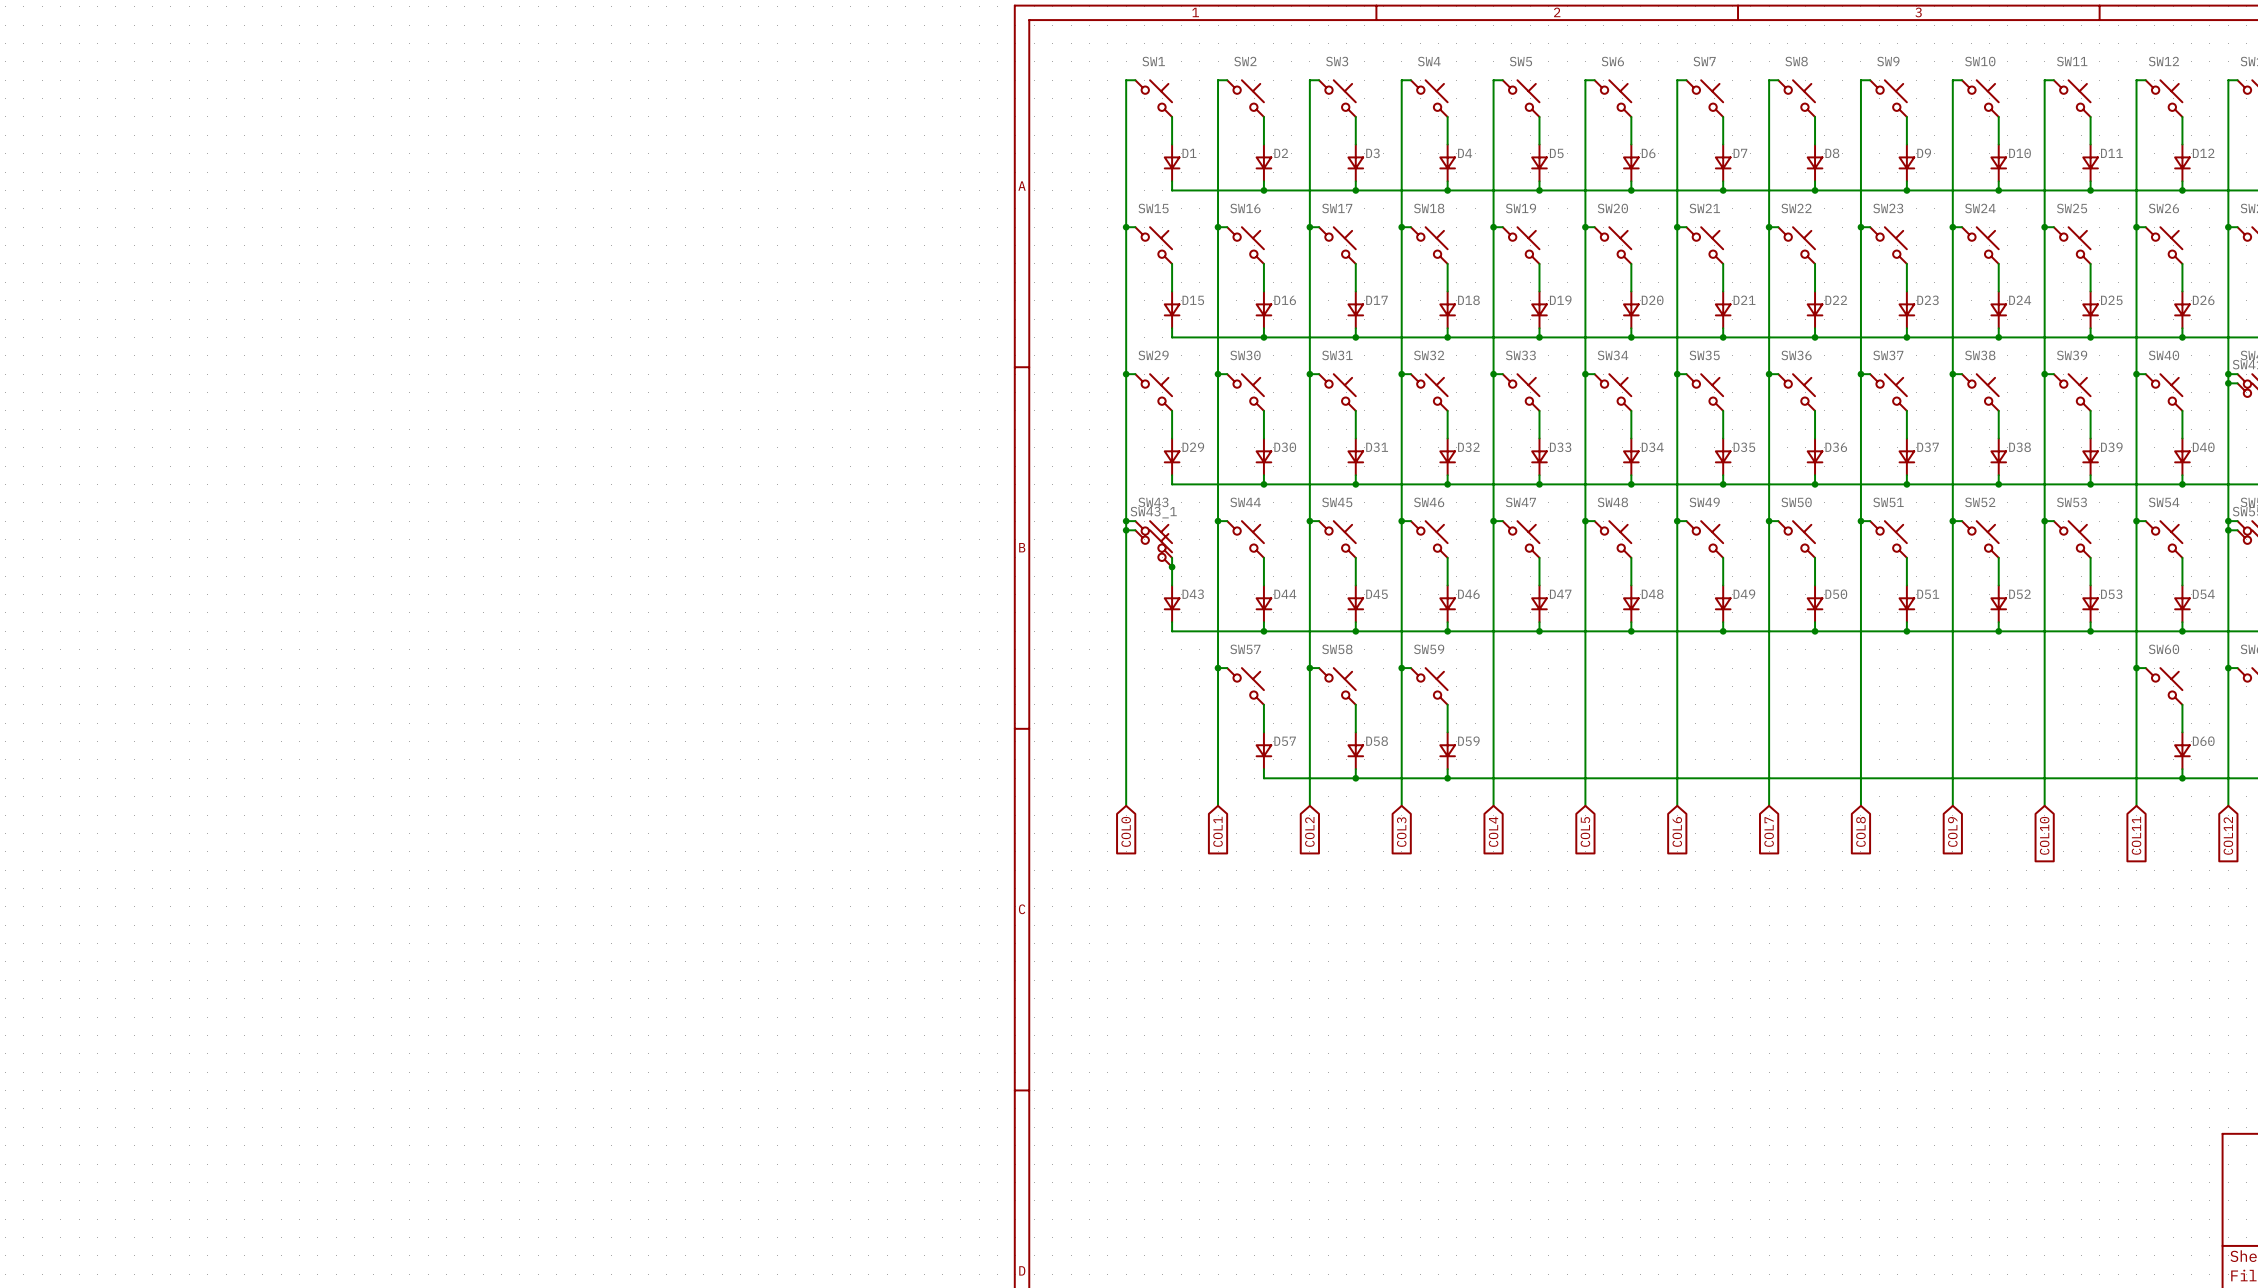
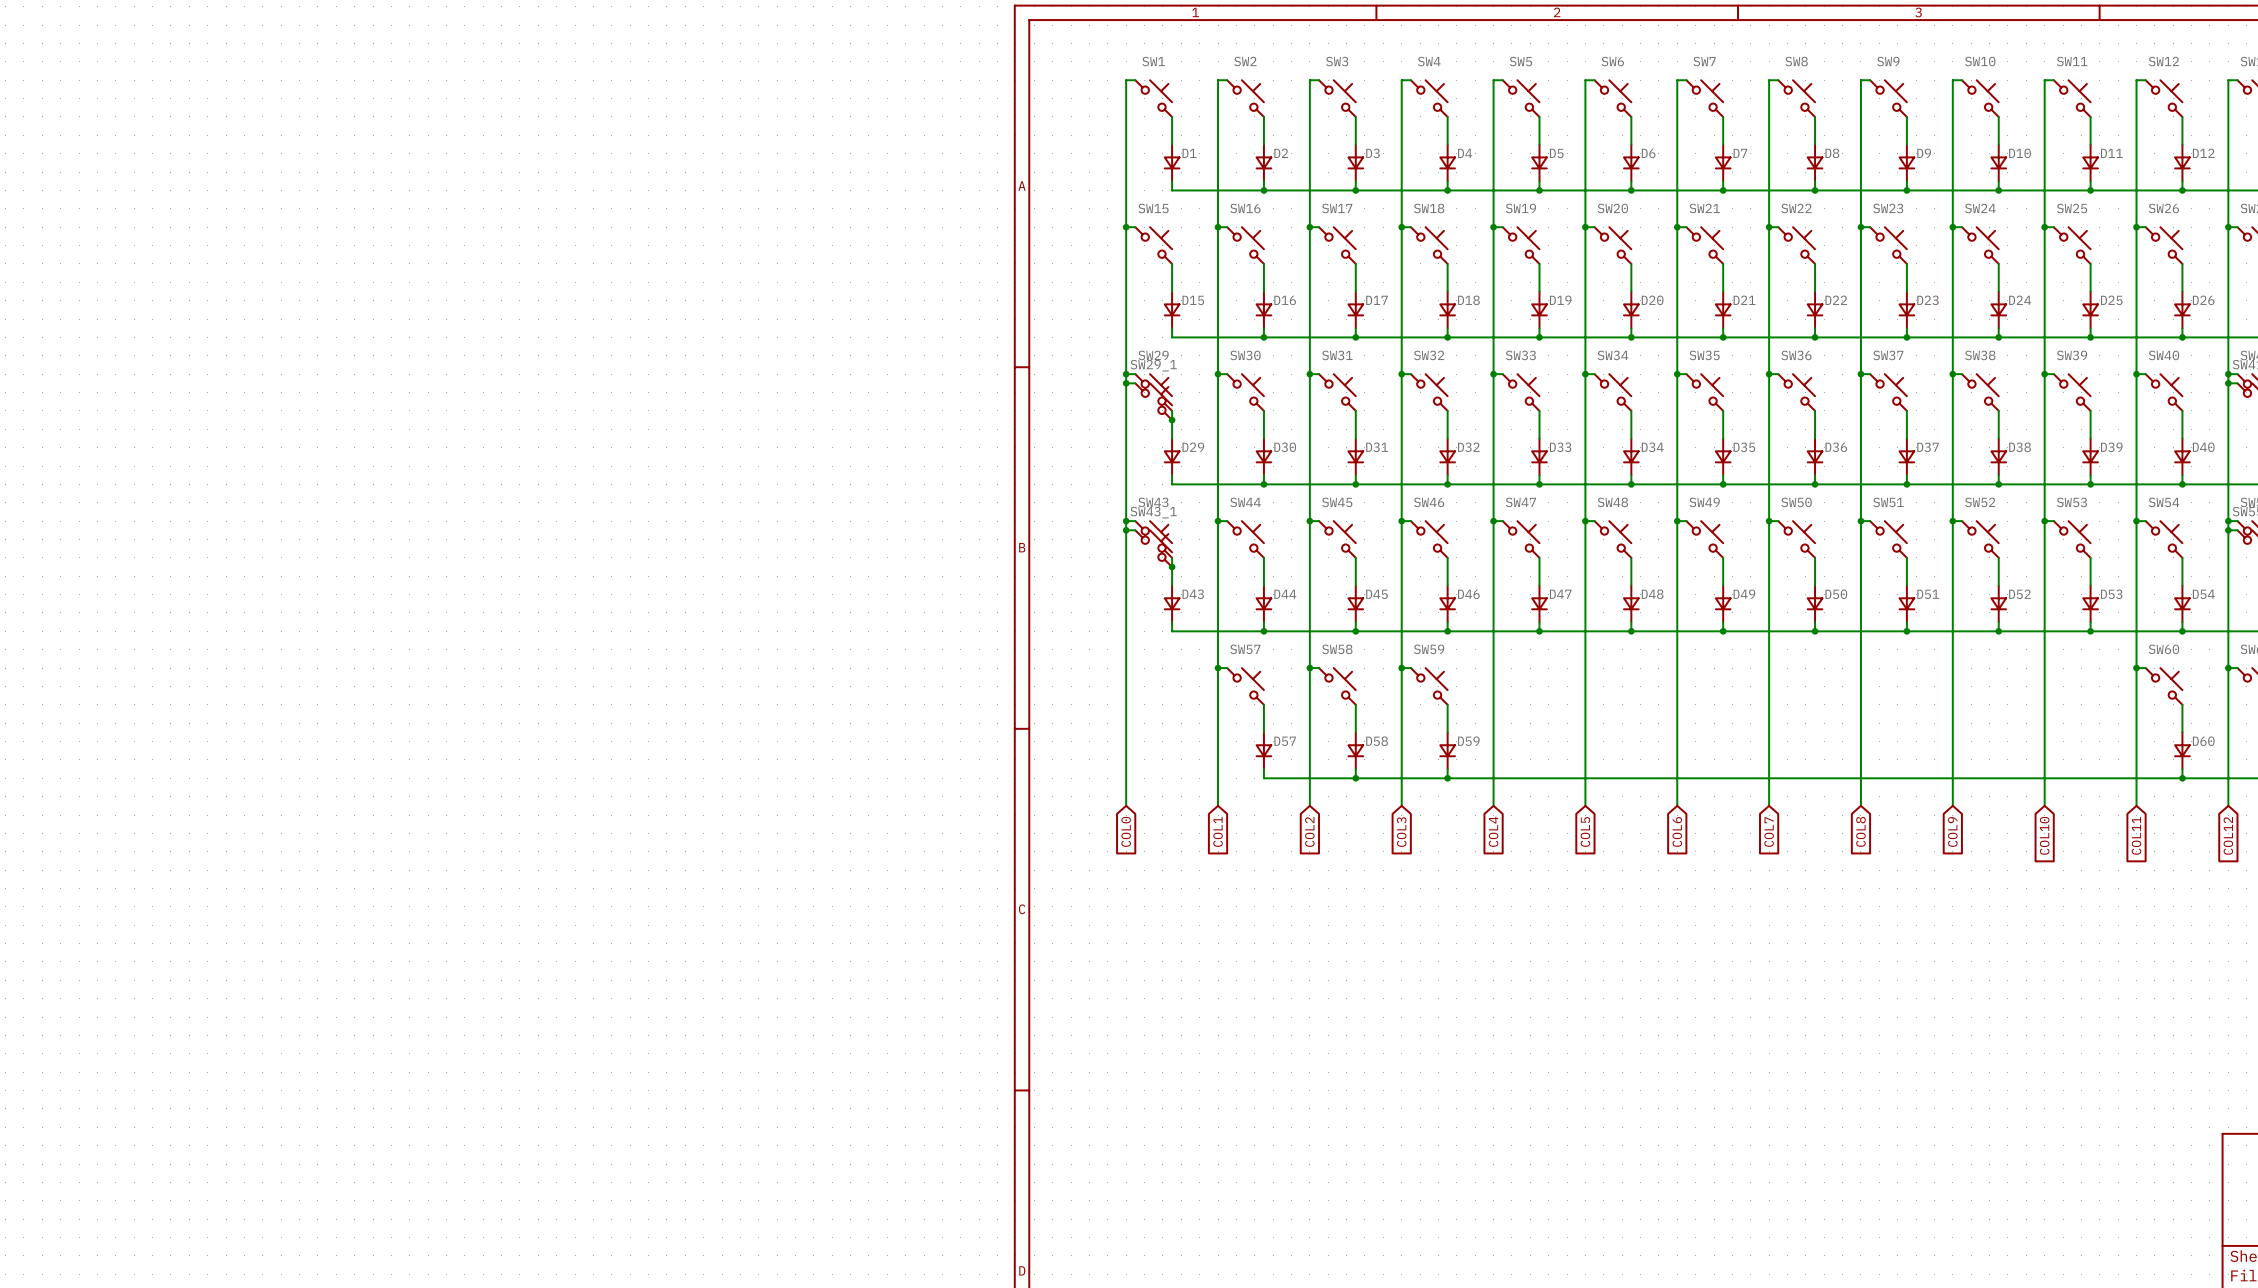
wire: none -> (1126, 383) (1135, 383)
junction: none -> (1126, 383)
SW29_1: none -> (1153, 401)
junction: none -> (1172, 420)

